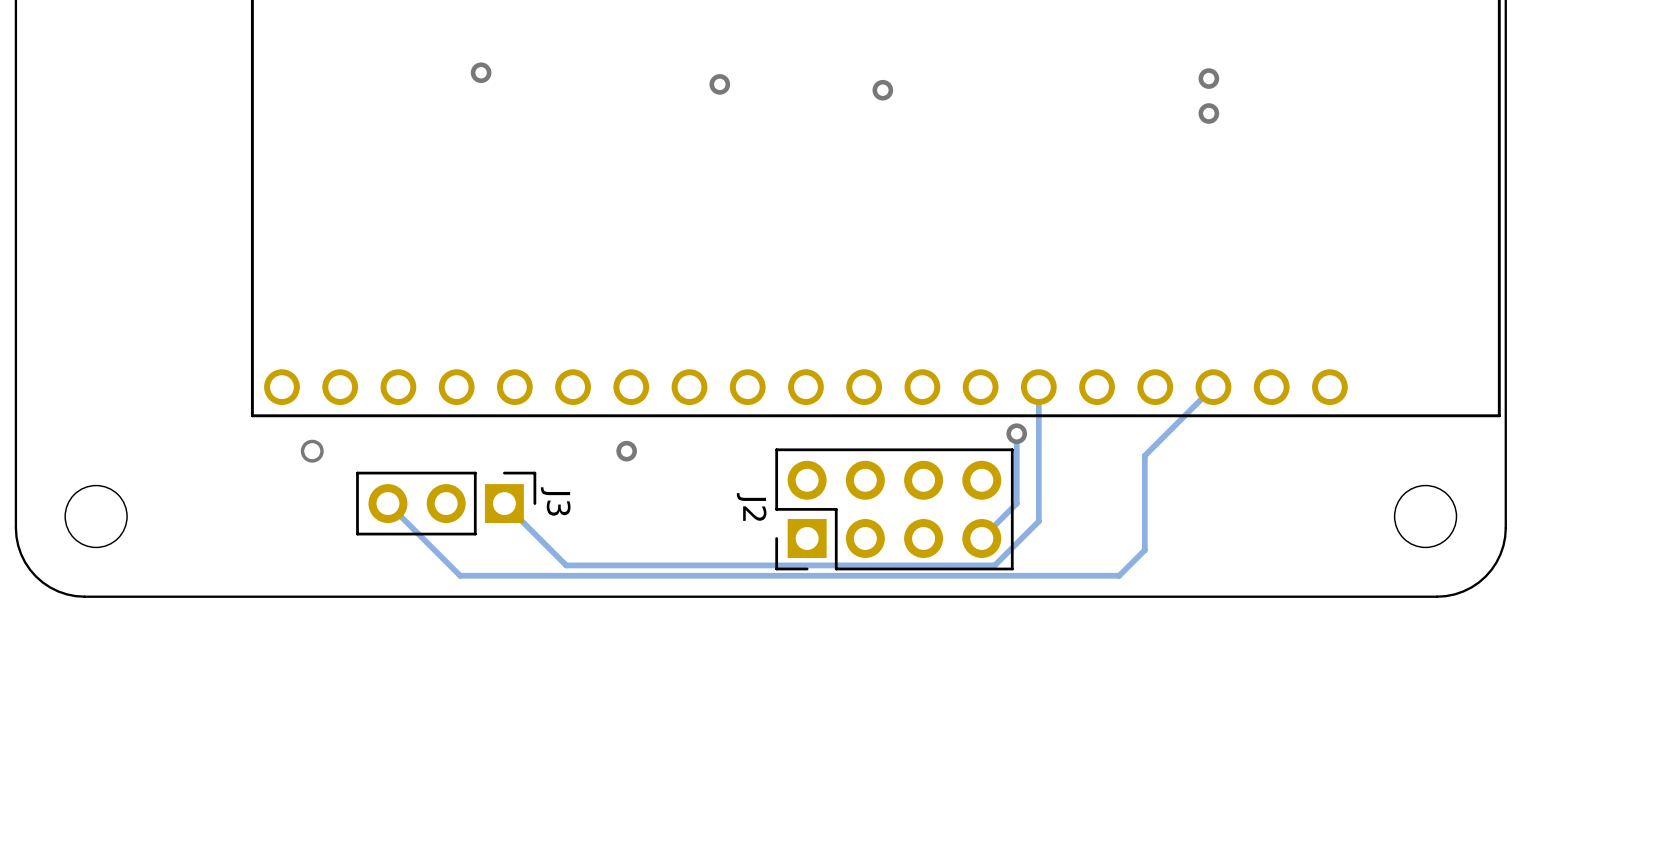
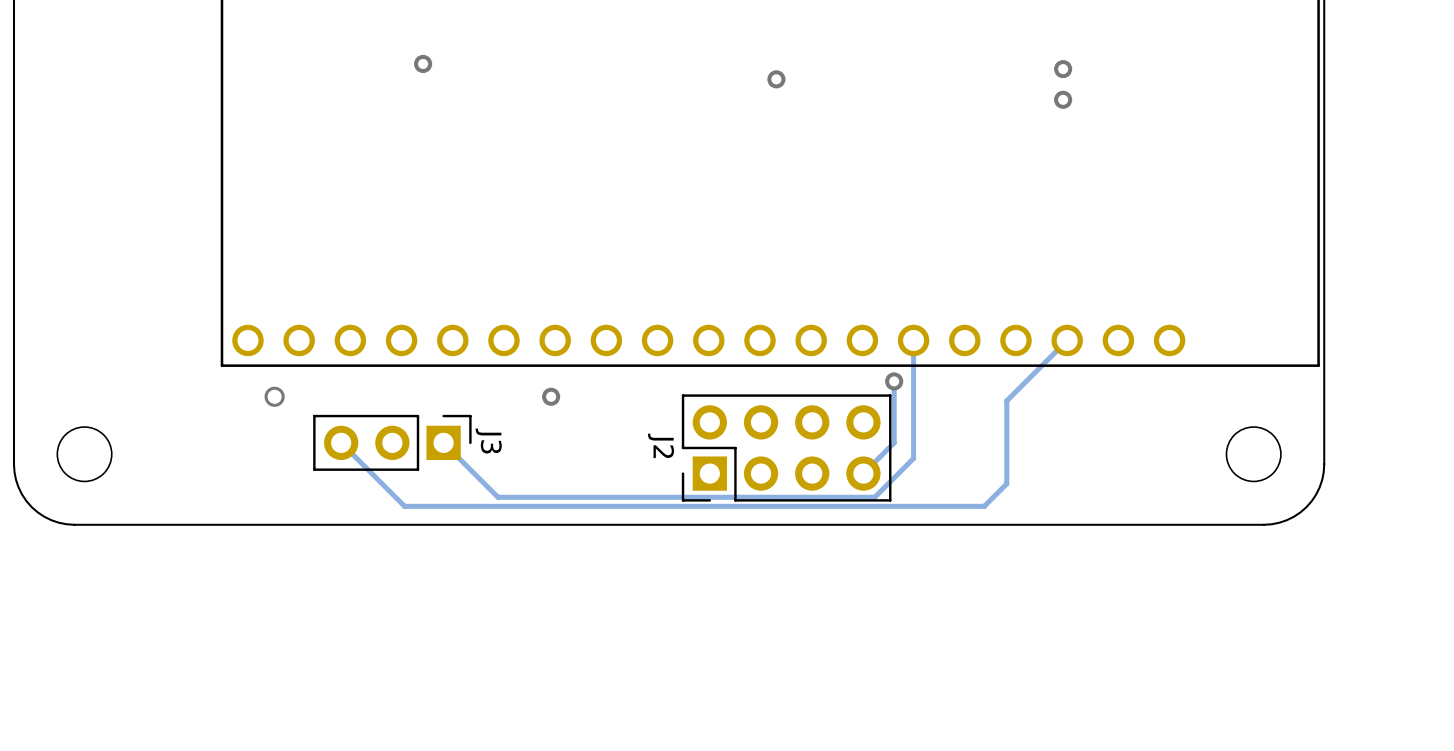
via: (719, 84) -> none

